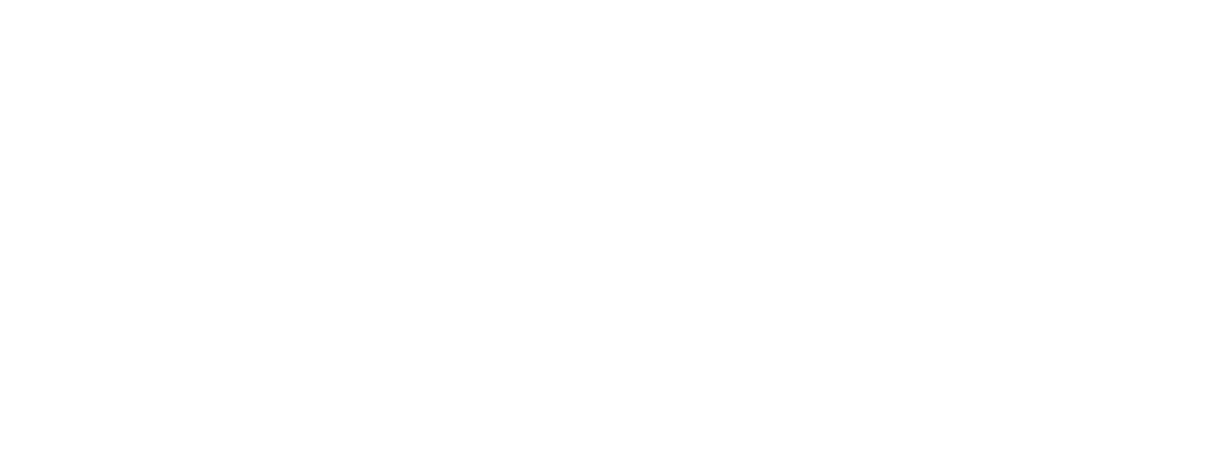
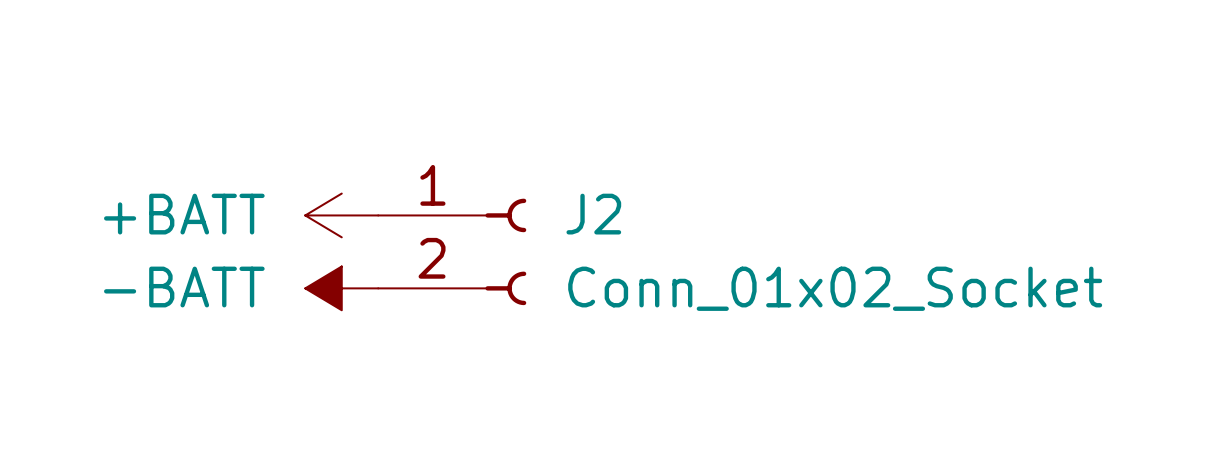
power symbol: none -> +BATT (341, 215)
J2: none -> Conn_01x02_Socket (452, 251)
power symbol: none -> -BATT (341, 288)

